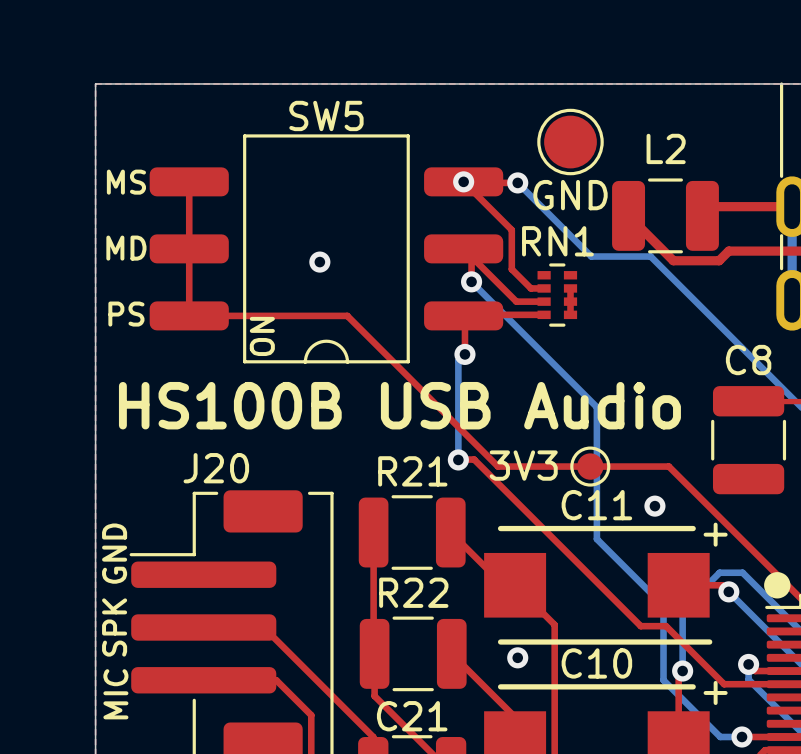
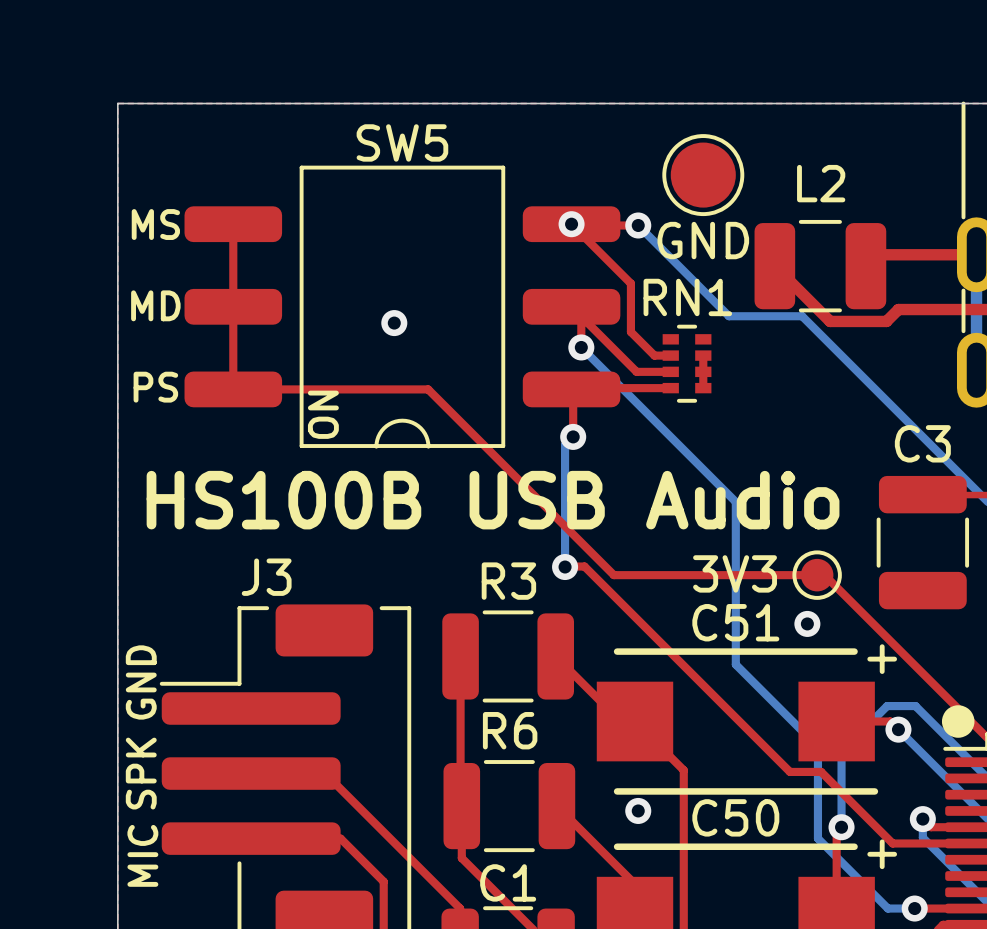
C8 name: C8 (748, 360) -> C3 (922, 443)
part position: (590, 466) -> (817, 575)
J20 name: J20 (216, 468) -> J3 (266, 577)
R21 name: R21 (412, 471) -> R3 (508, 581)
C11 name: C11 (596, 505) -> C51 (735, 622)
R22 name: R22 (413, 592) -> R6 (510, 730)
C10 name: C10 (596, 663) -> C50 (735, 817)
C21 name: C21 (412, 716) -> C1 (508, 882)

